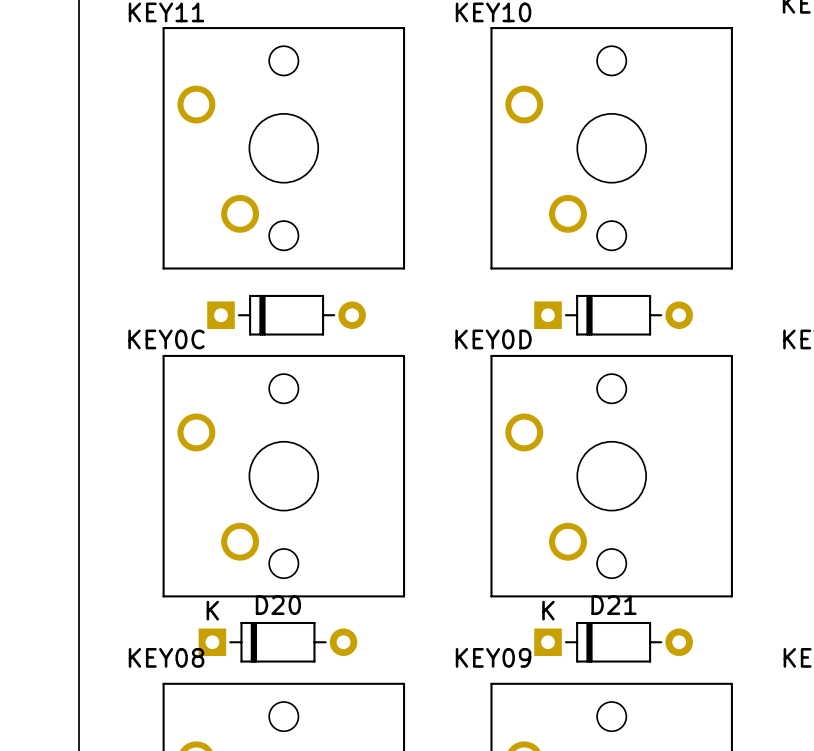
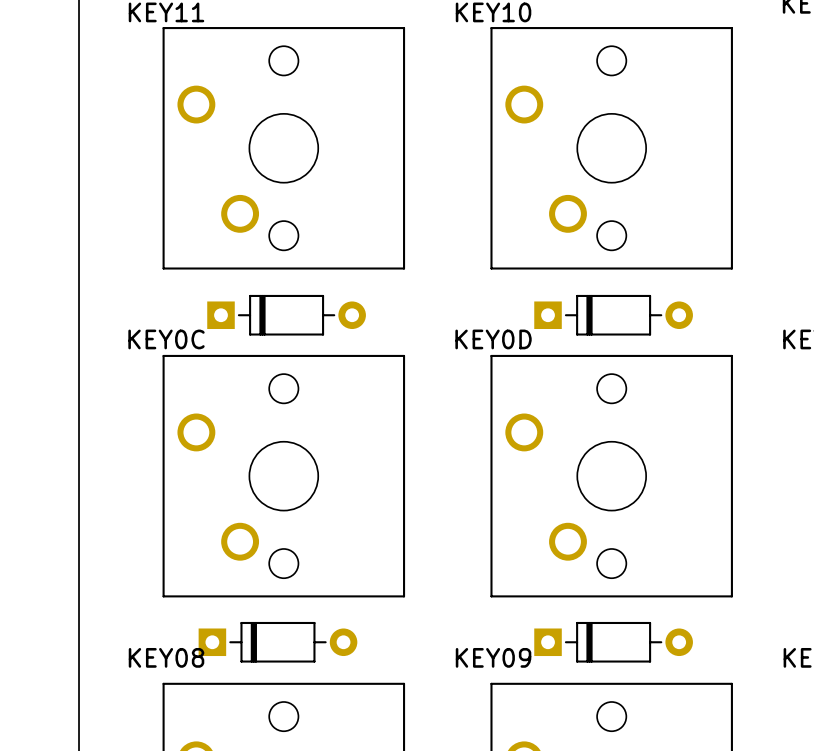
D20 name: D20 (278, 605) -> none
D21 name: D21 (614, 605) -> none
D20 text: K (212, 610) -> none
D21 text: K (548, 610) -> none

